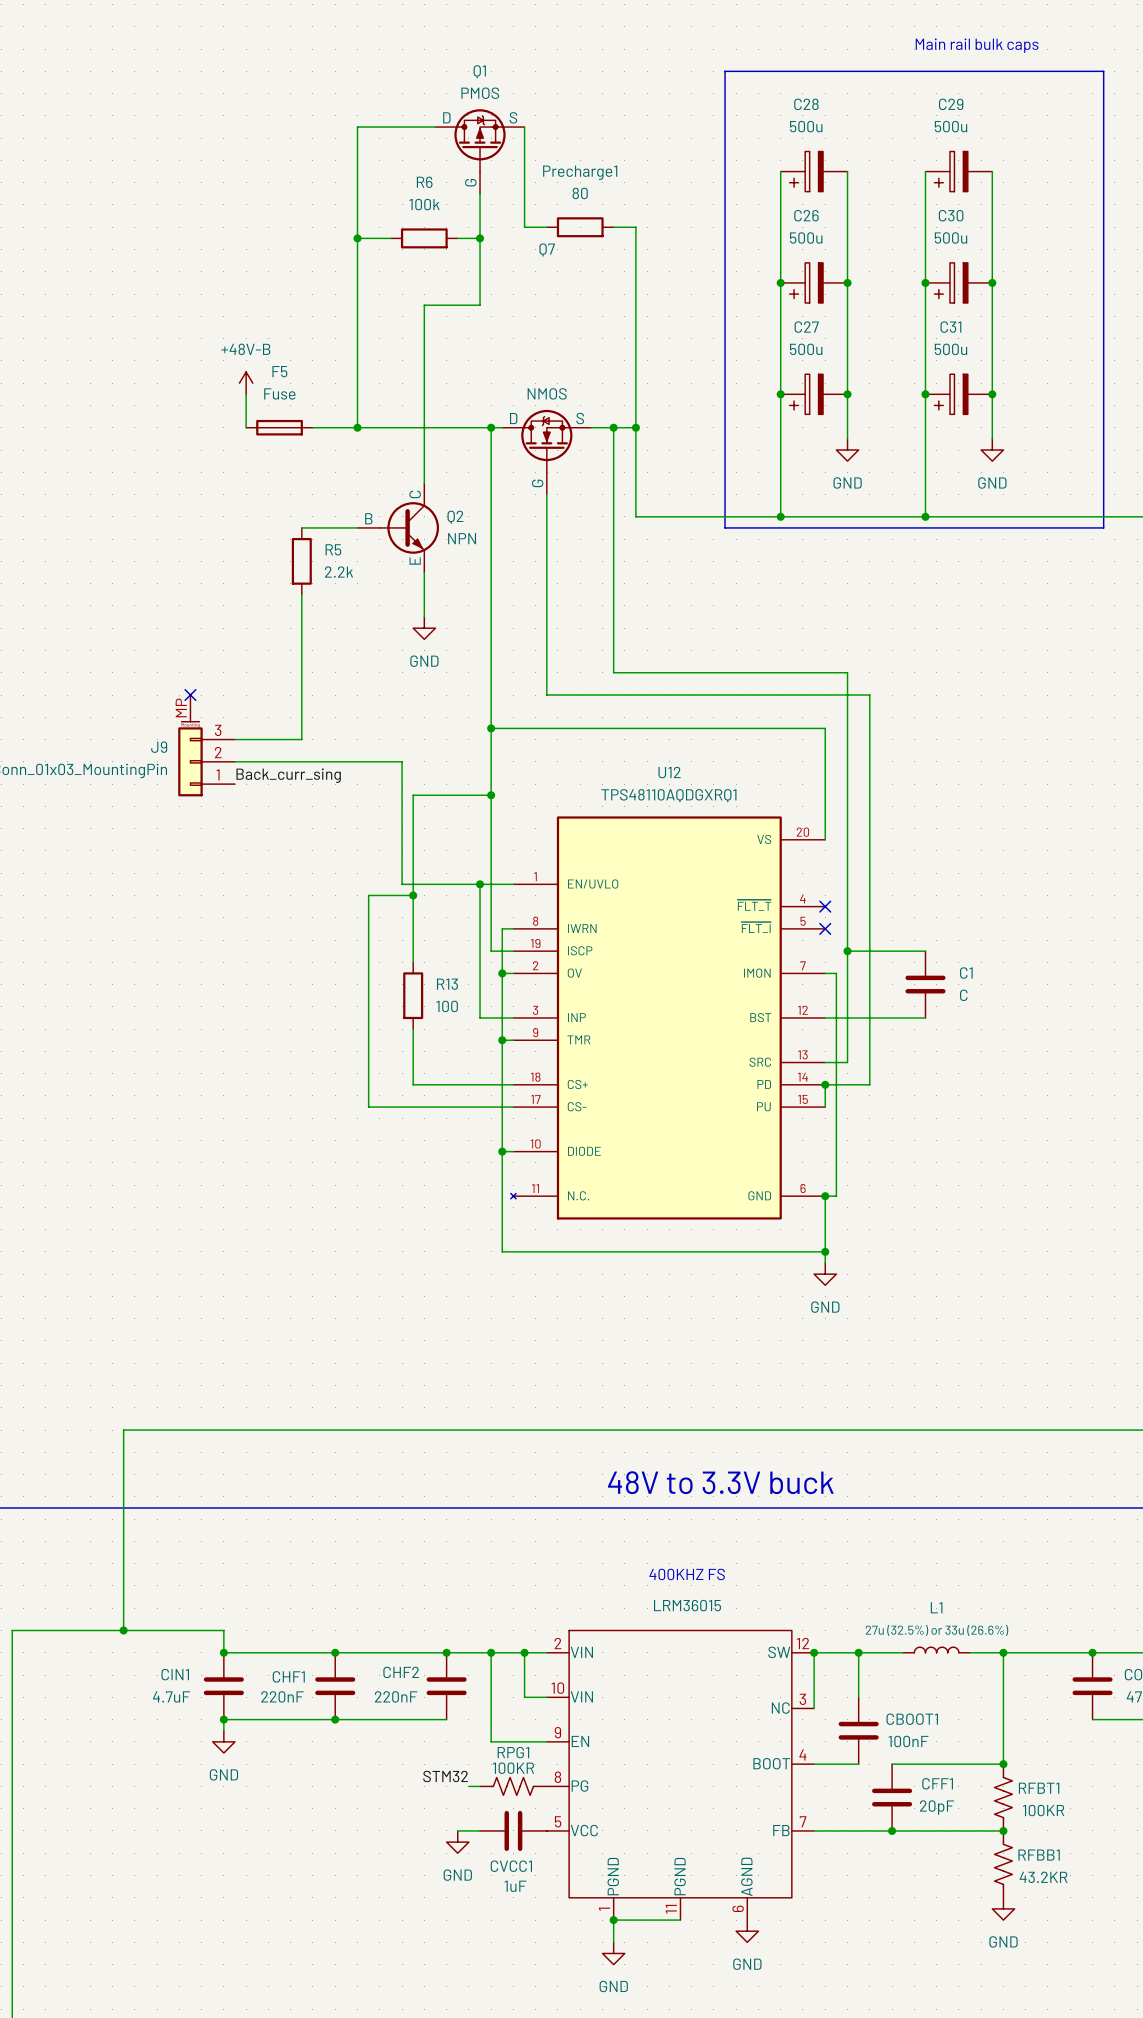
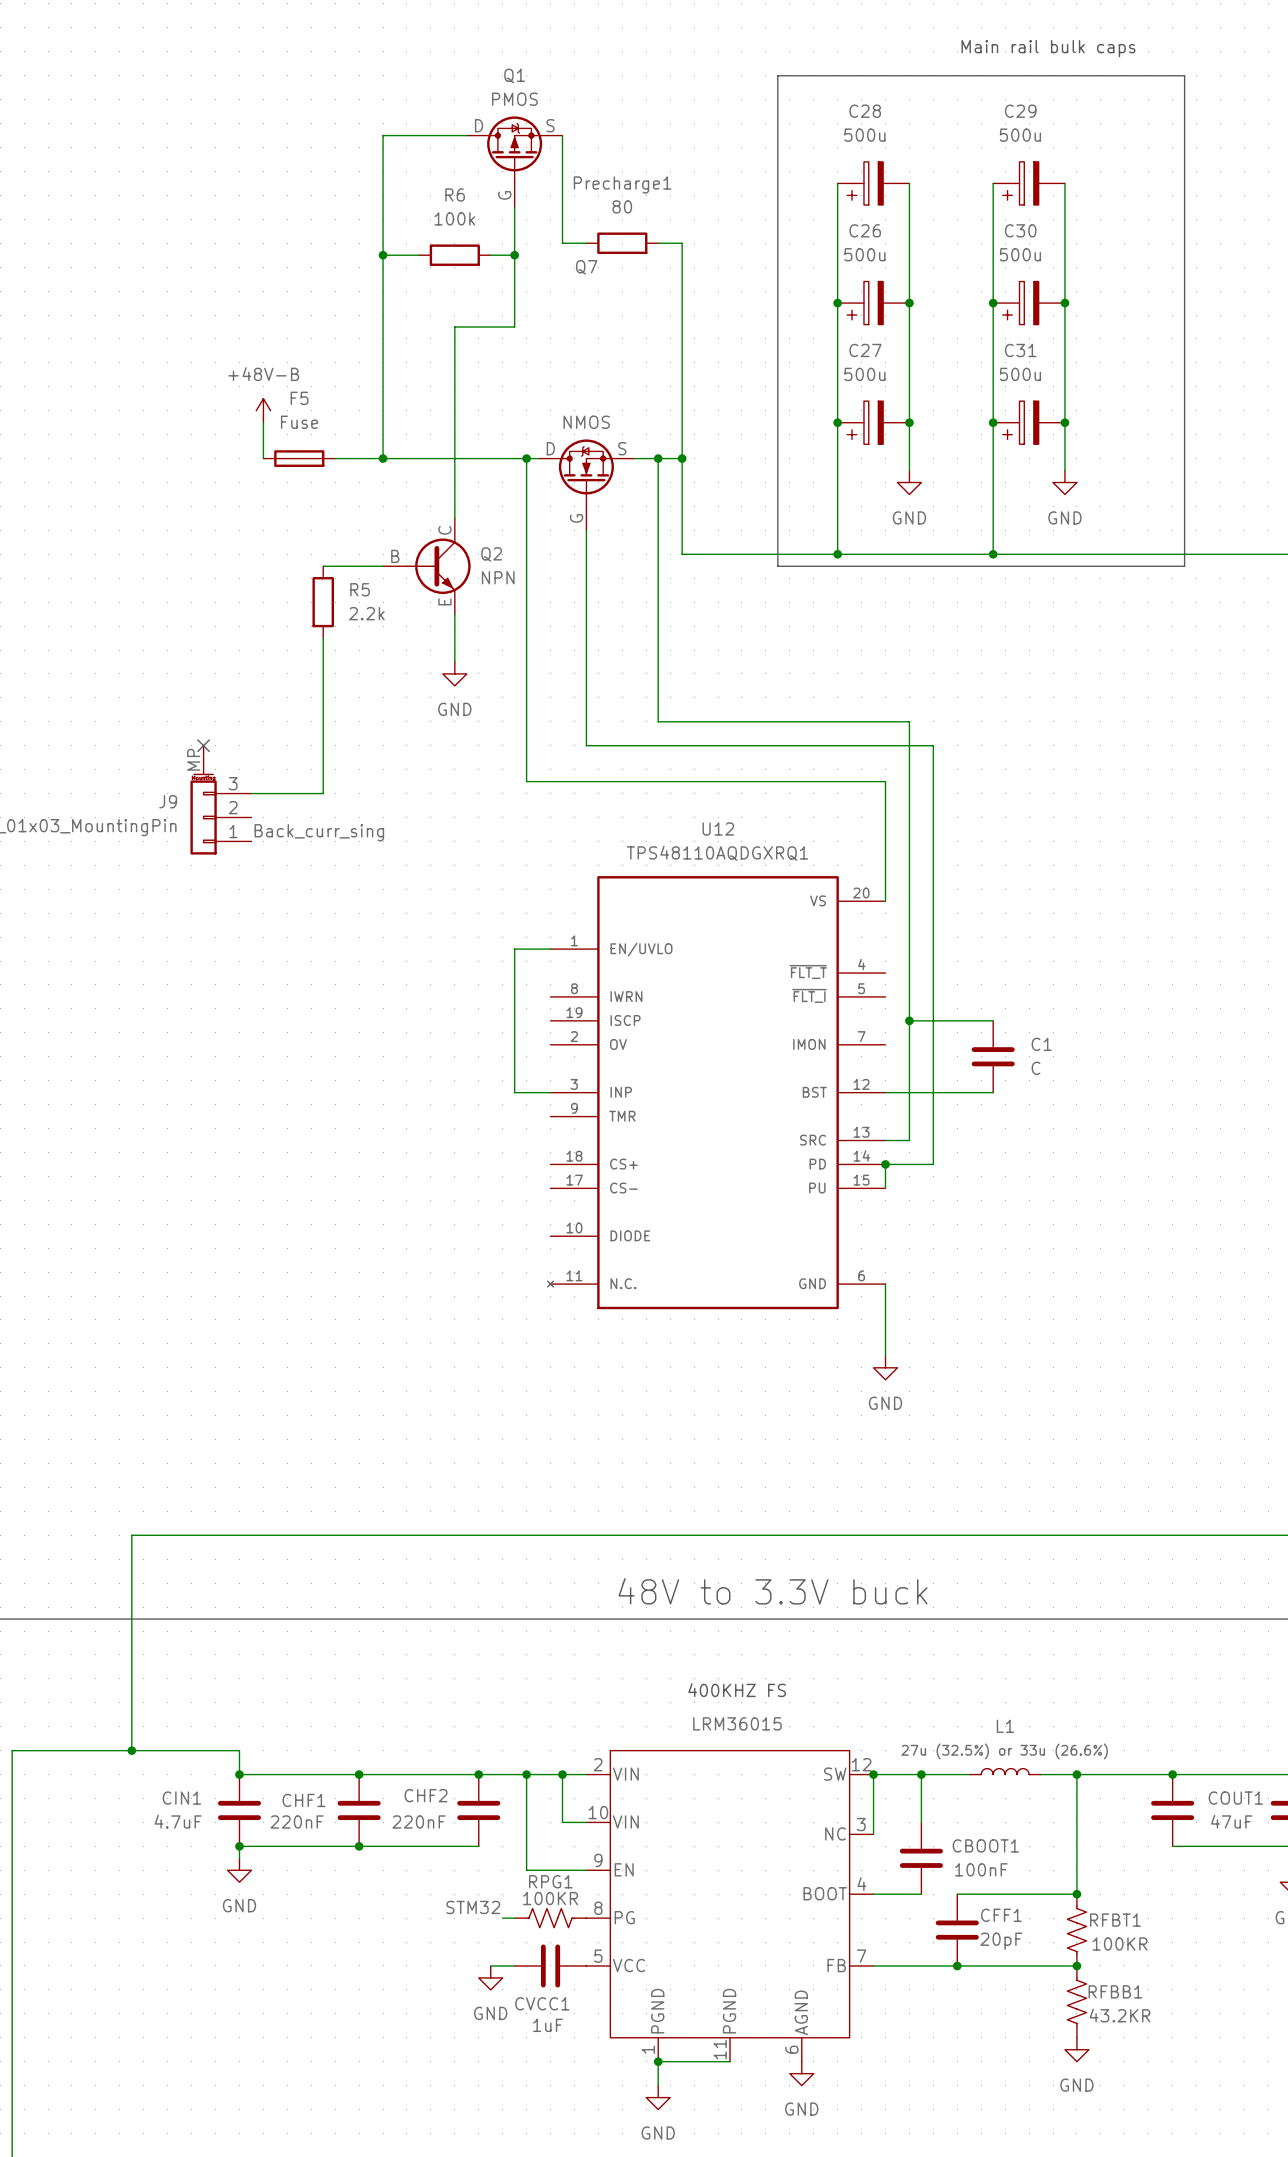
wire: (491, 728) (491, 951) (513, 951) -> none
junction: (491, 728) -> none
wire: (235, 761) (402, 761) (402, 884) (480, 884) -> none
wire: (491, 795) (413, 795) (413, 962) -> none
junction: (491, 795) -> none
junction: (480, 884) -> none
wire: (413, 895) (368, 895) (368, 1107) (513, 1107) -> none
junction: (413, 895) -> none
no-connect mark: (825, 906) -> none
wire: (513, 928) (502, 928) (502, 1251) (825, 1251) -> none
no-connect mark: (825, 928) -> none
wire: (502, 973) (513, 973) -> none
junction: (502, 973) -> none
wire: (825, 973) (836, 973) (836, 1196) (825, 1196) -> none
R13: 100 (413, 995) -> none
wire: (413, 1029) (413, 1084) (513, 1084) -> none
wire: (502, 1040) (513, 1040) -> none
junction: (502, 1040) -> none
wire: (502, 1151) (513, 1151) -> none
junction: (502, 1151) -> none
junction: (825, 1196) -> none
junction: (825, 1251) -> none

